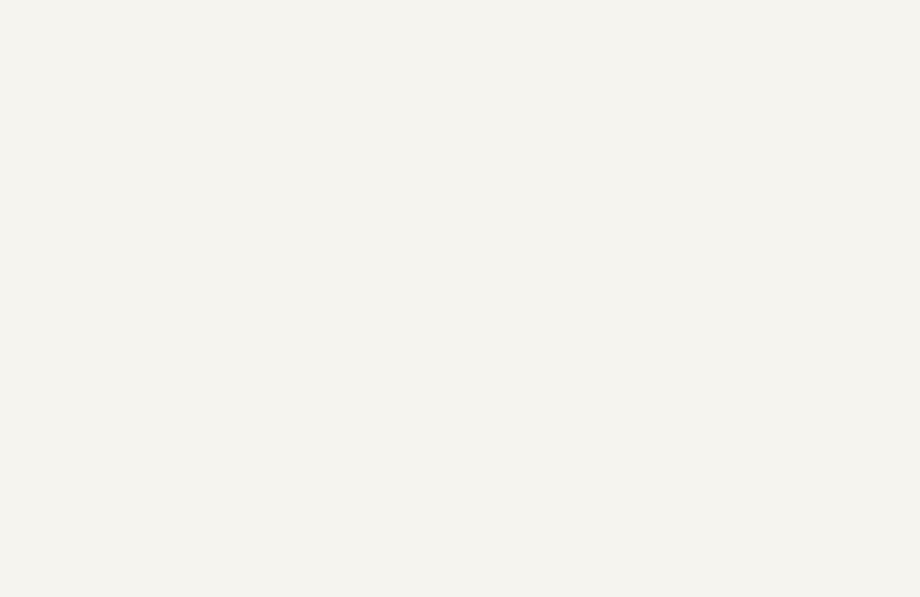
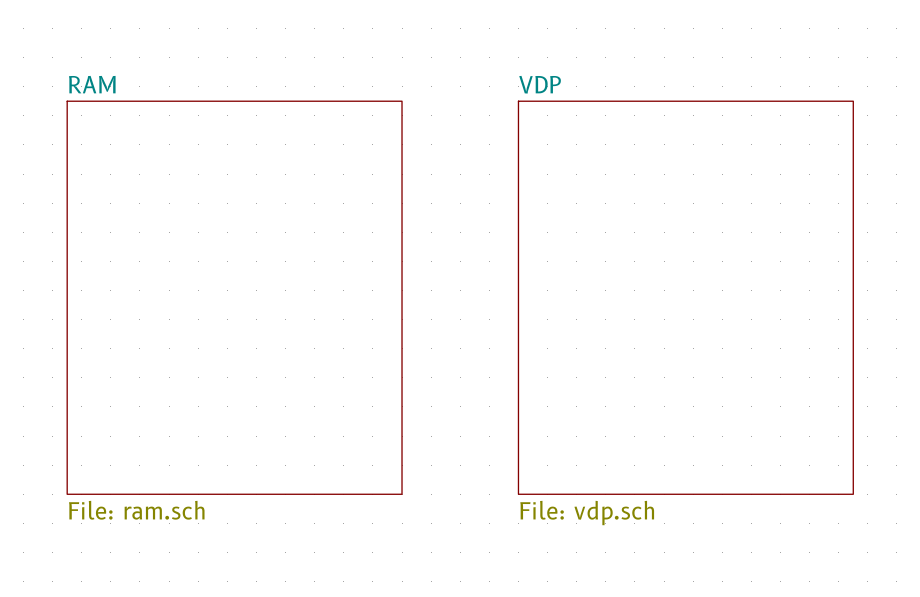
sheet RAM: none -> File: ram.sch (234, 297)
sheet VDP: none -> File: vdp.sch (685, 297)

